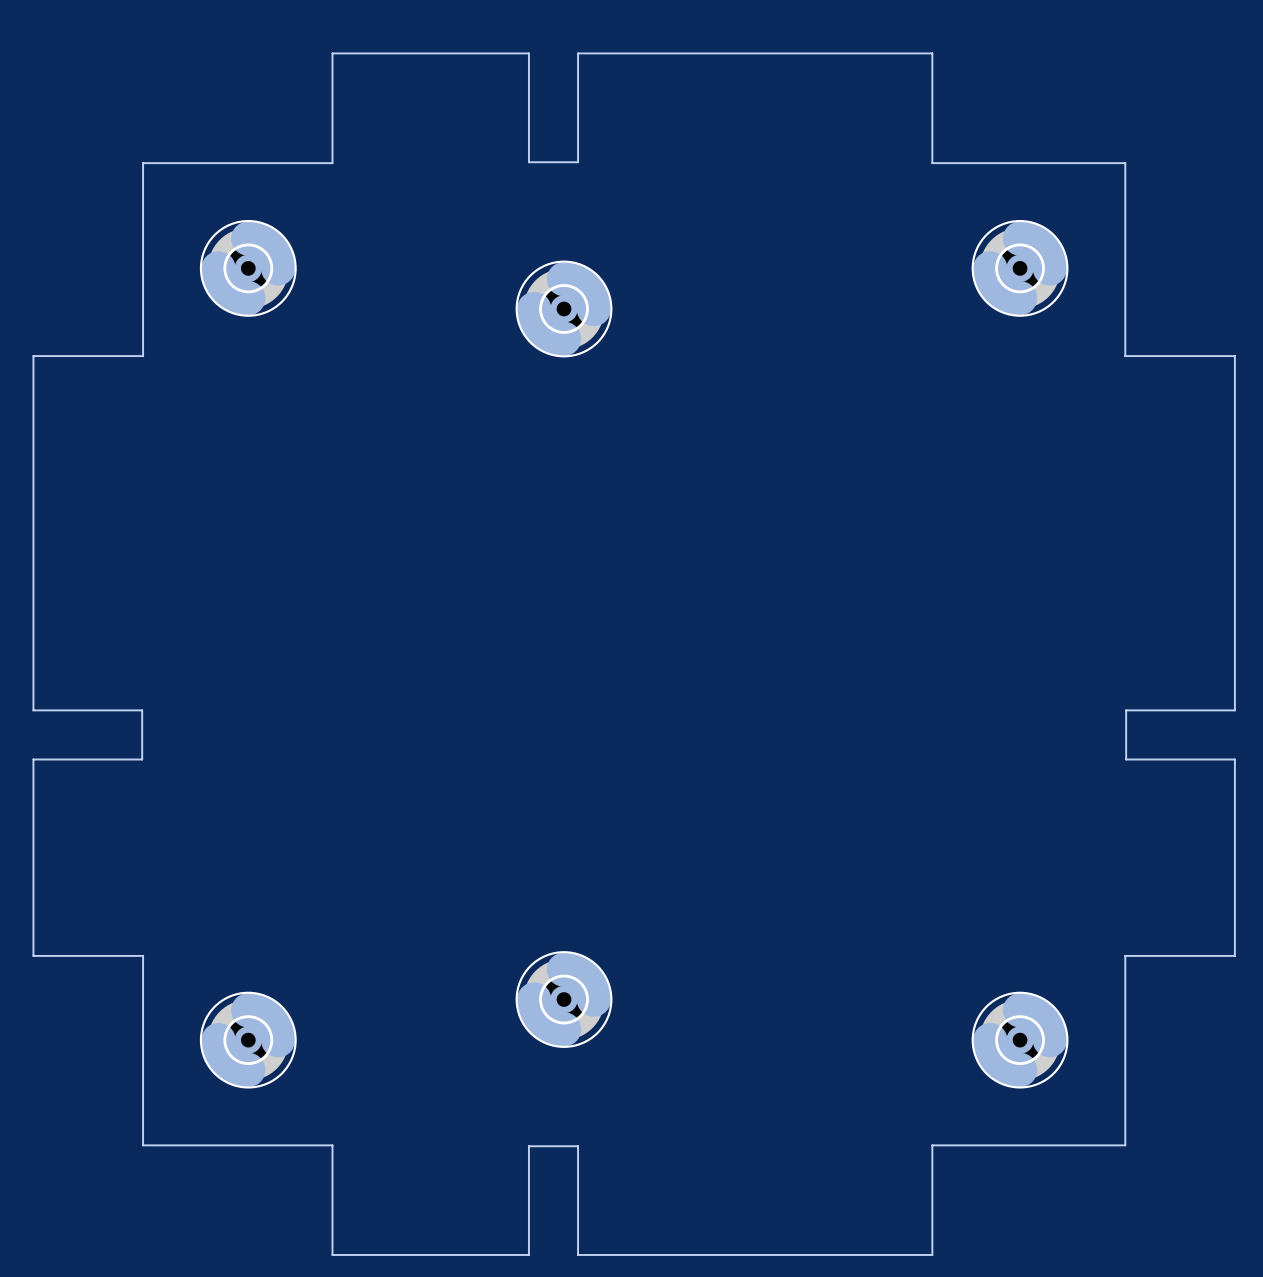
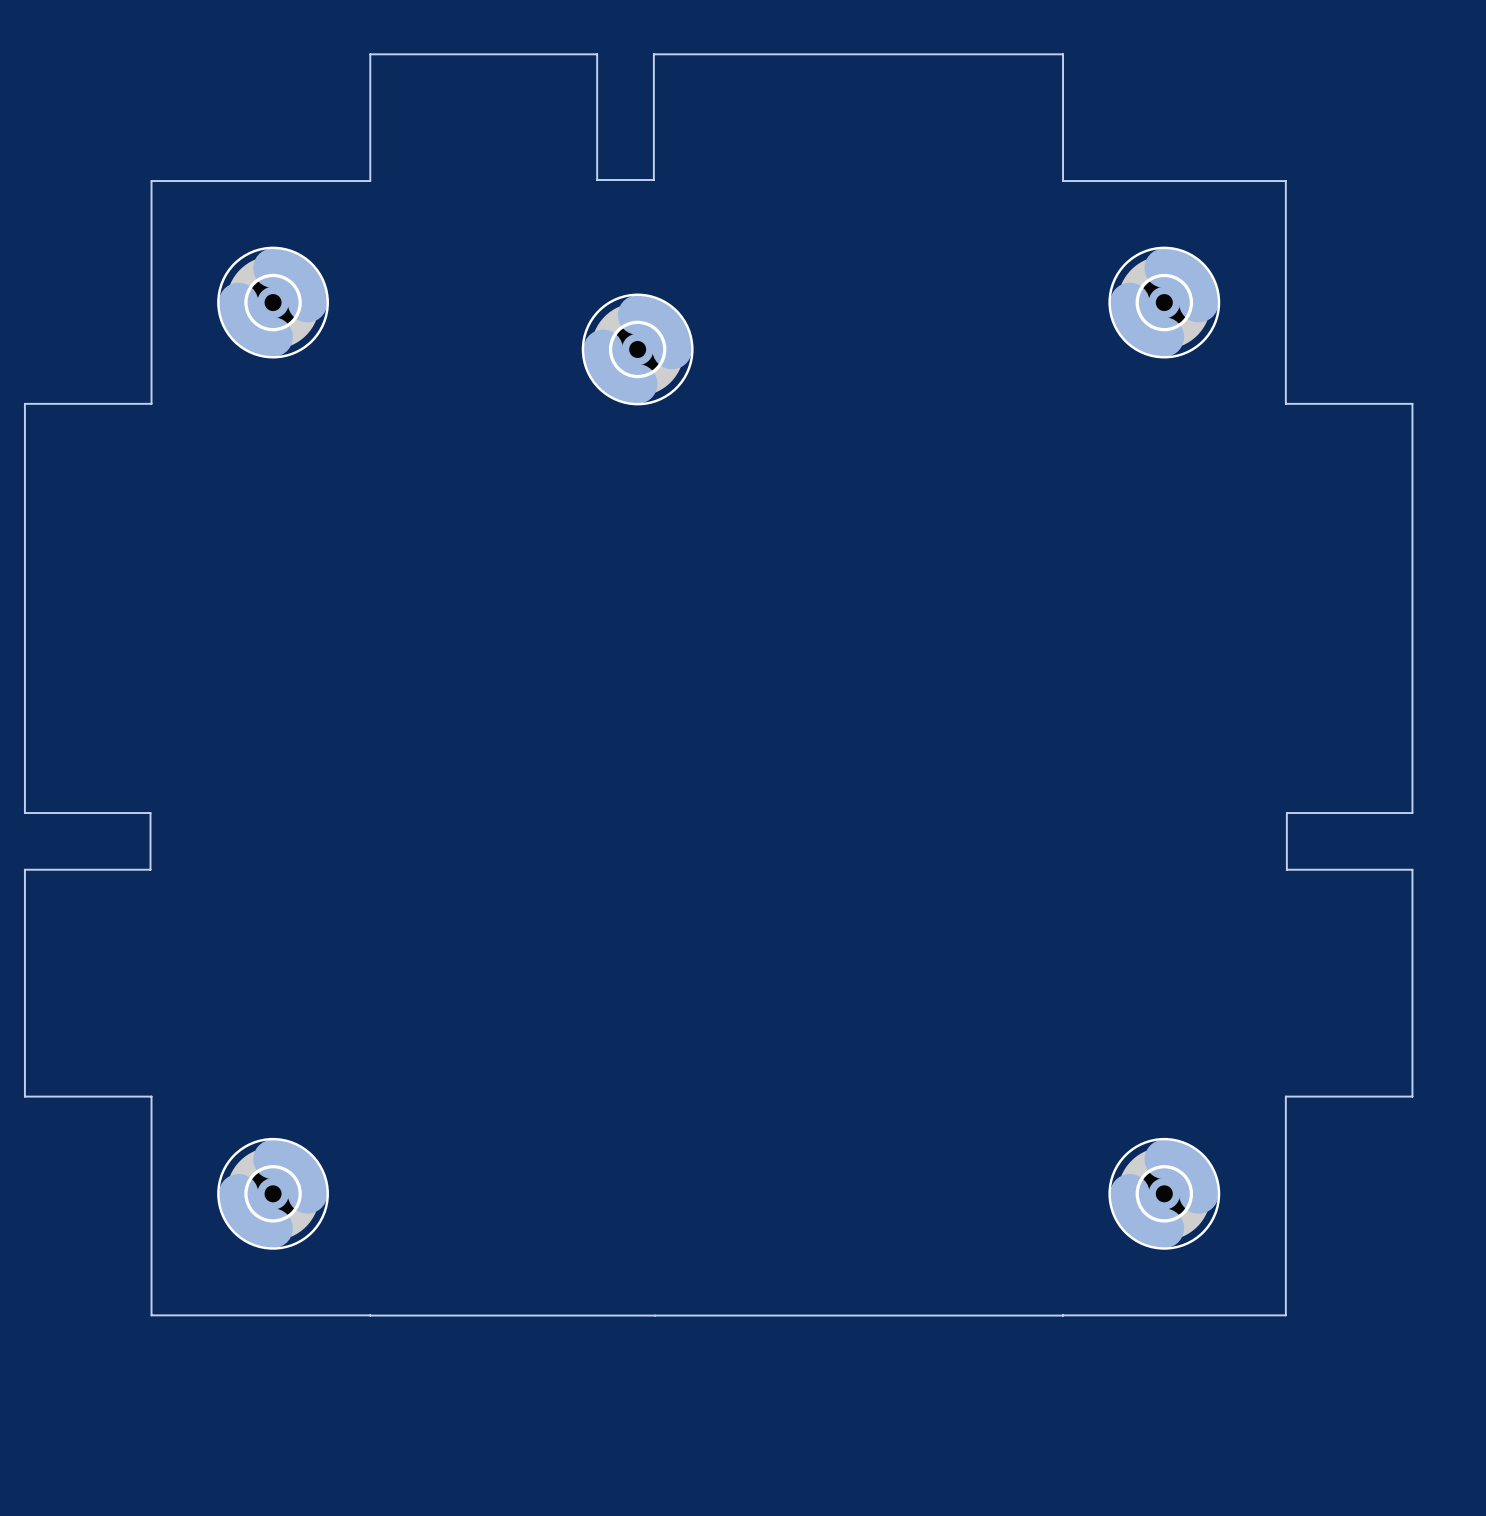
part: (564, 999) -> none
board edge: (332, 1145) (332, 1254) (528, 1254) (528, 1146) (578, 1146) (578, 1254) (932, 1254) (932, 1145) -> (370, 1315) (1063, 1315)

